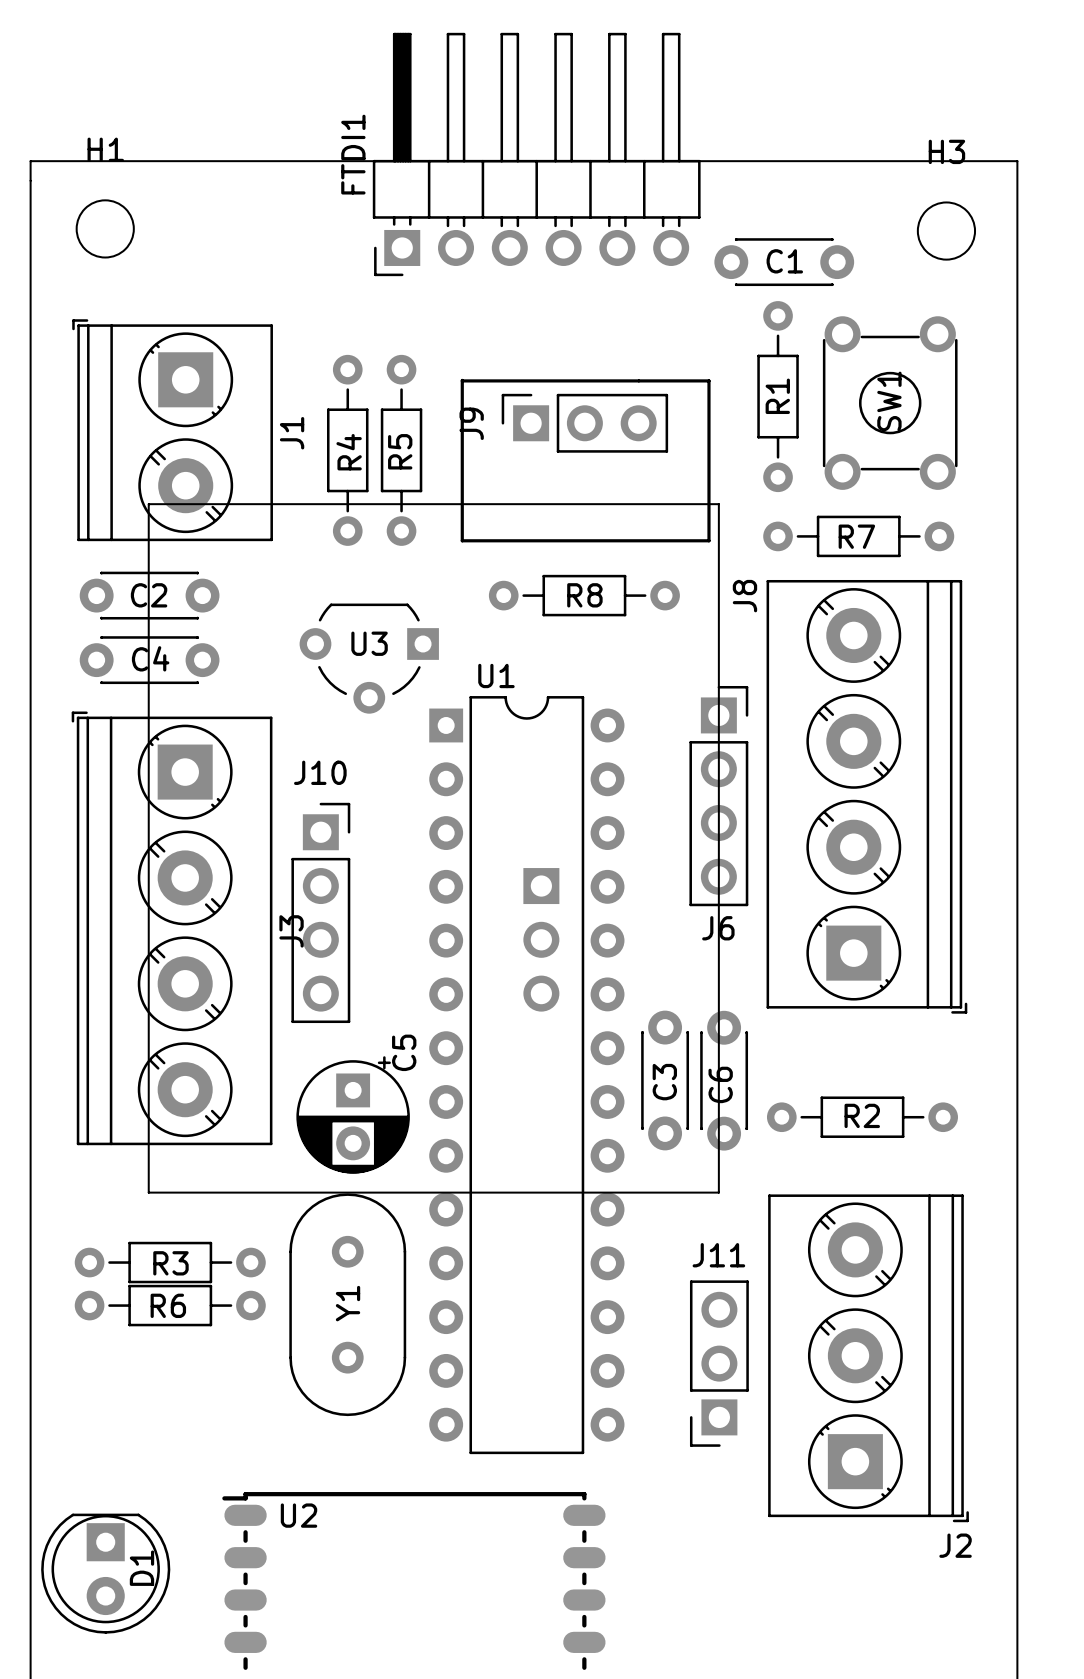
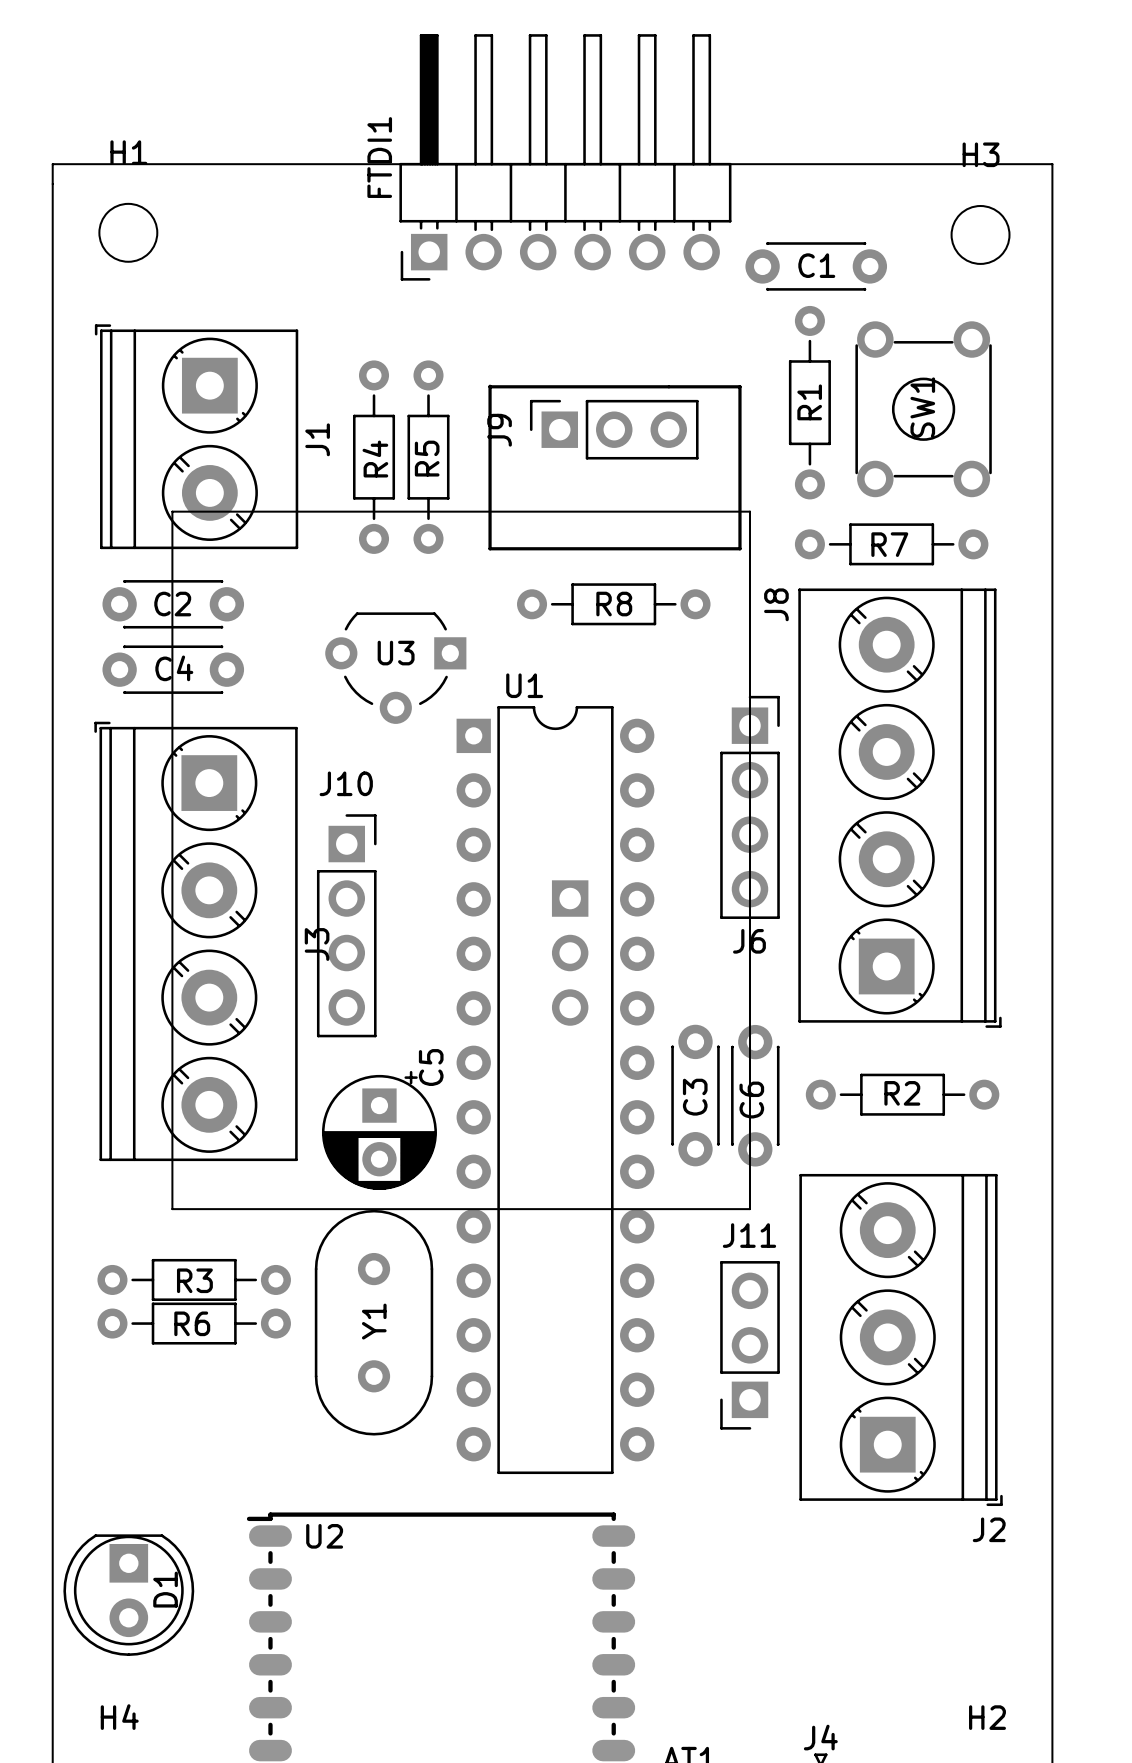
R2 position: (862, 1117) -> (902, 1094)
J2 position: (868, 1358) -> (901, 1339)
J11 position: (719, 1363) -> (749, 1345)

